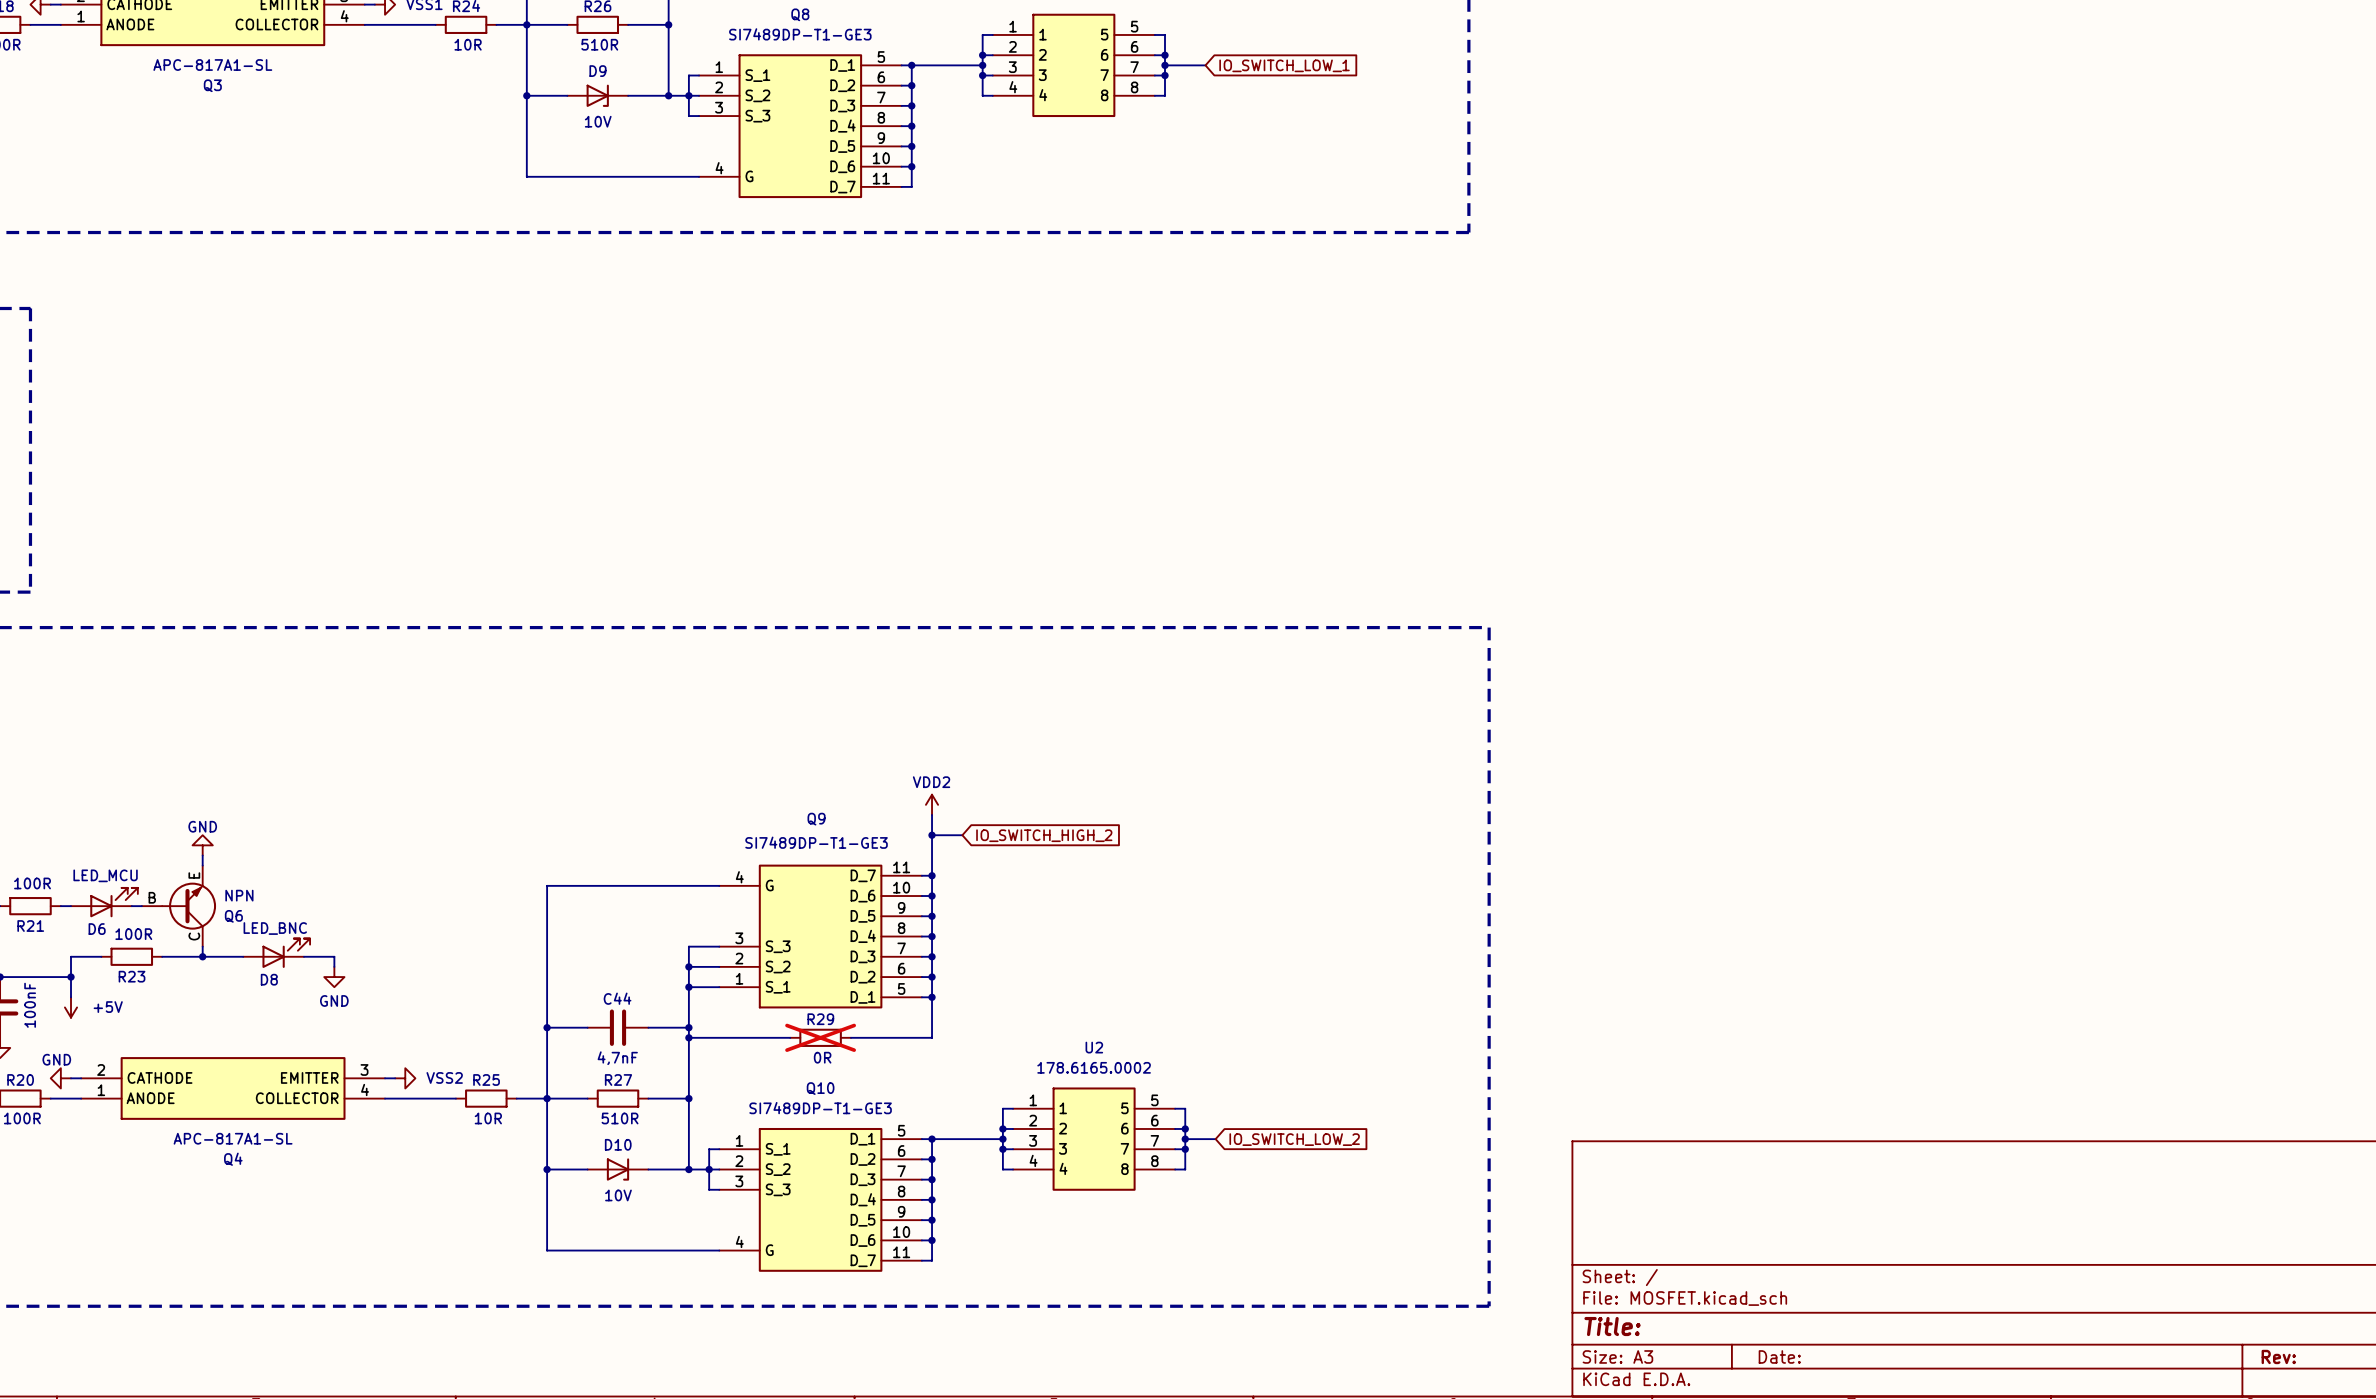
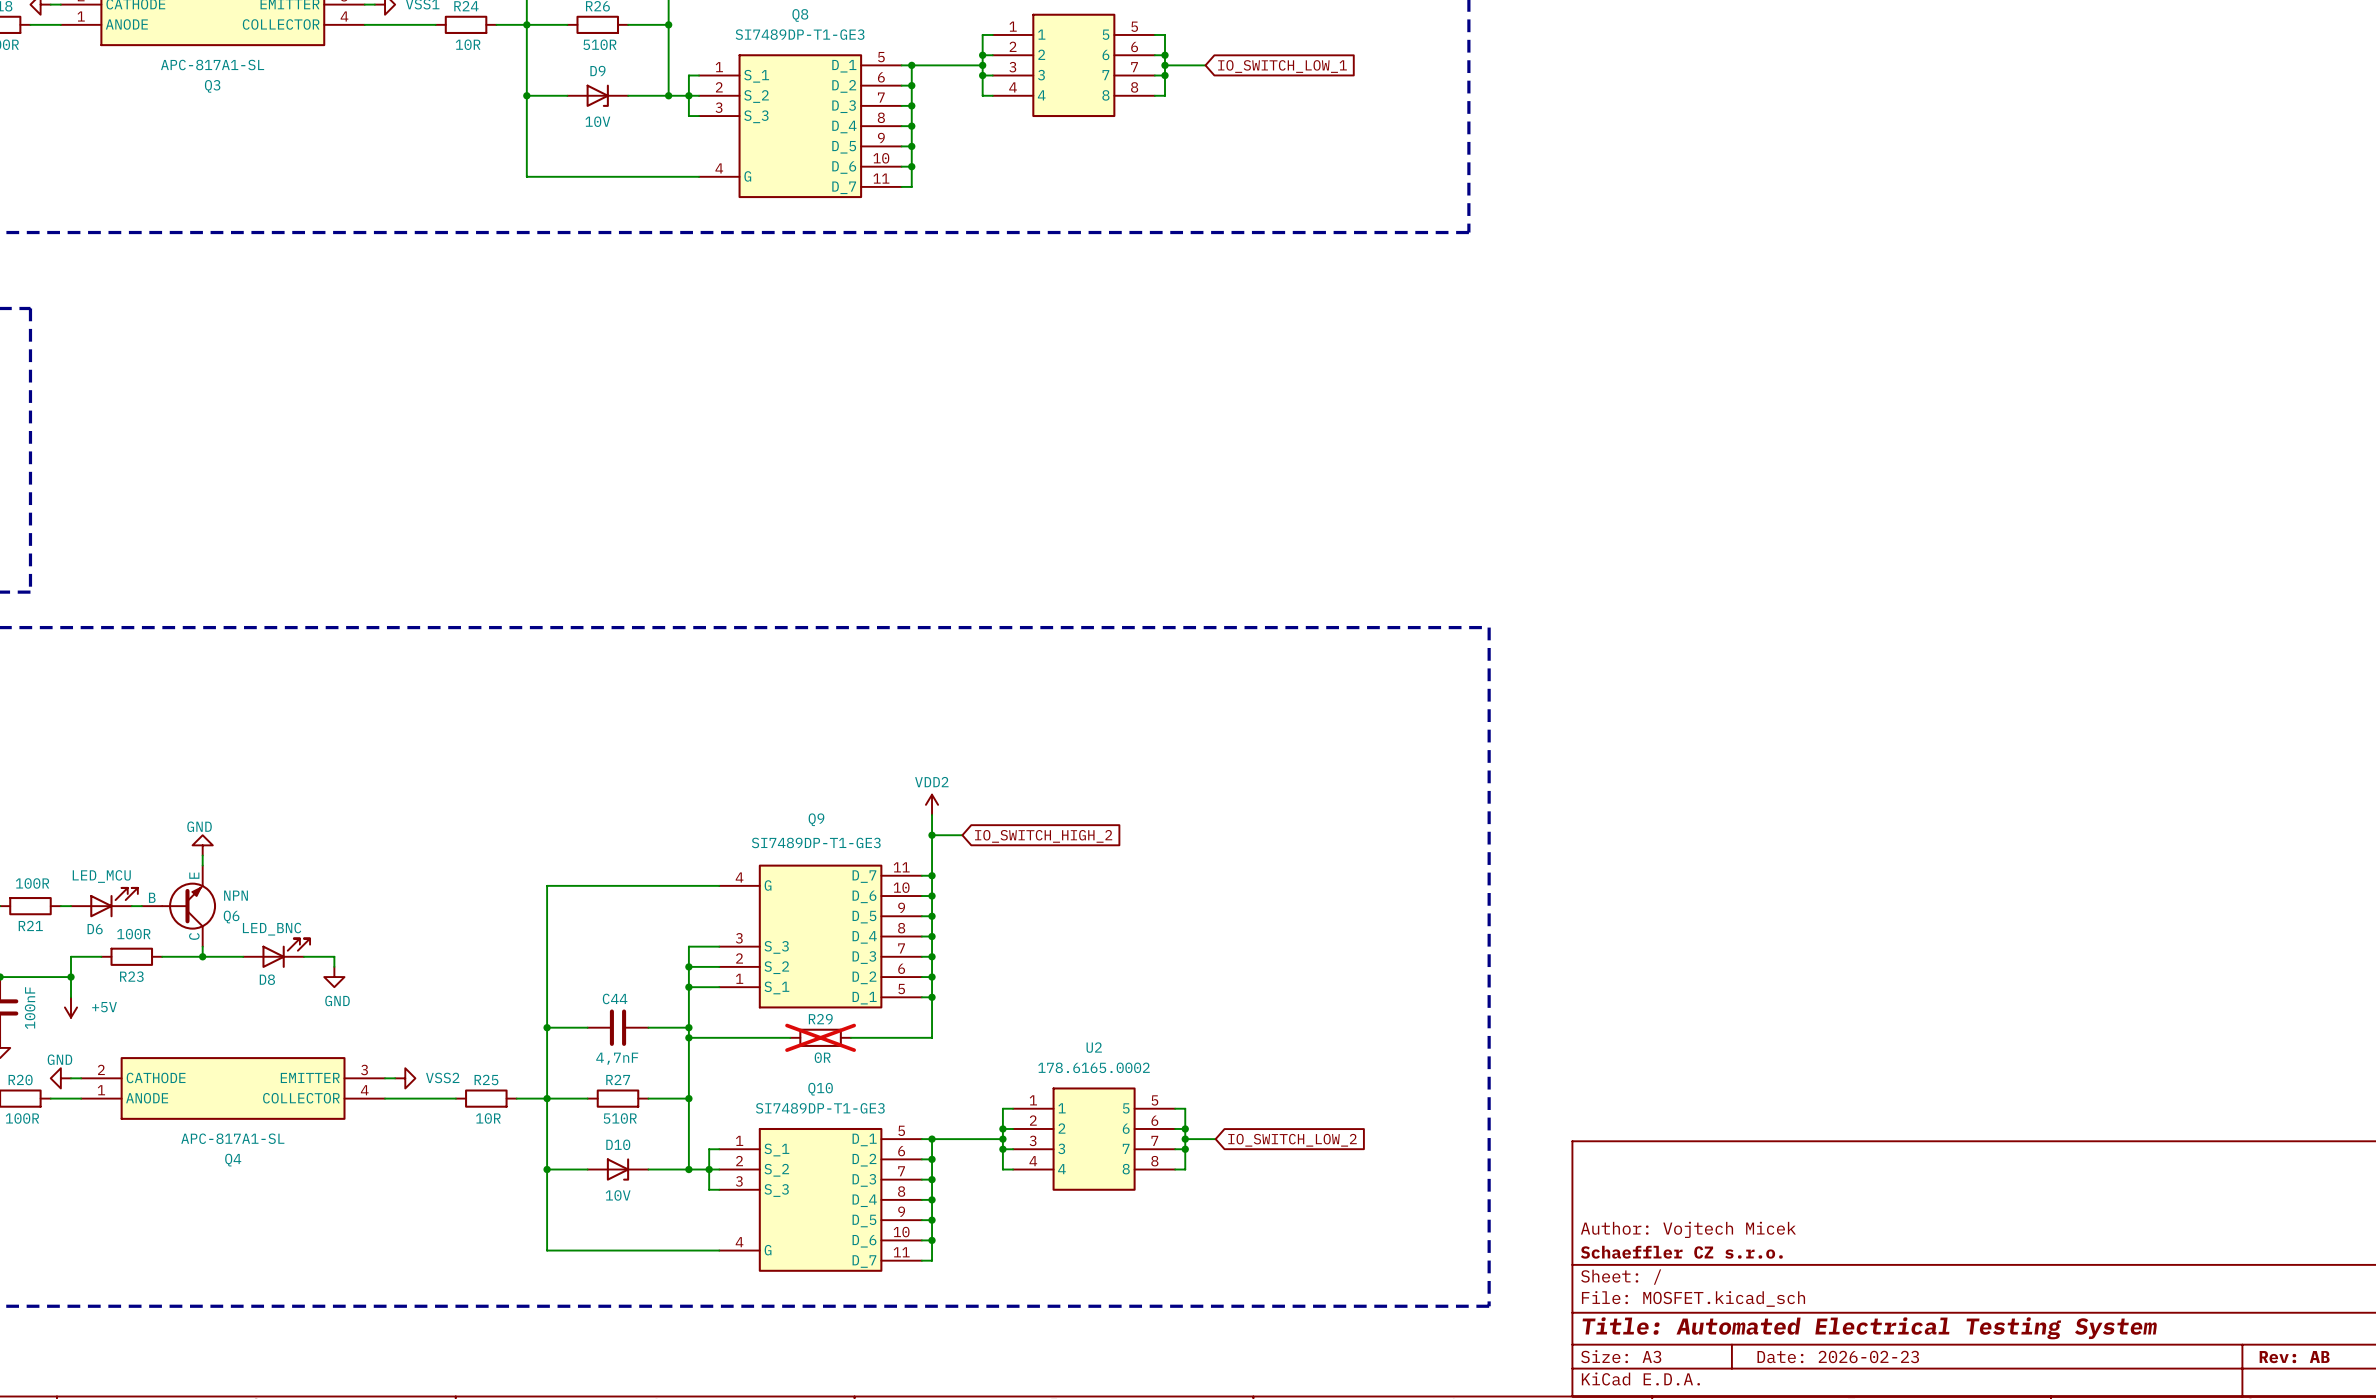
title block: none -> Author: Vojtech Micek (1688, 1229)
title block: none -> Schaeffler CZ s.r.o. (1681, 1252)
title block: Title: (1612, 1326) -> Title: Automated Electrical Testing System (1869, 1328)
title block: Date: (1779, 1356) -> Date: 2026-02-23 (1838, 1356)
title block: Rev: (2278, 1356) -> Rev: AB (2294, 1357)

